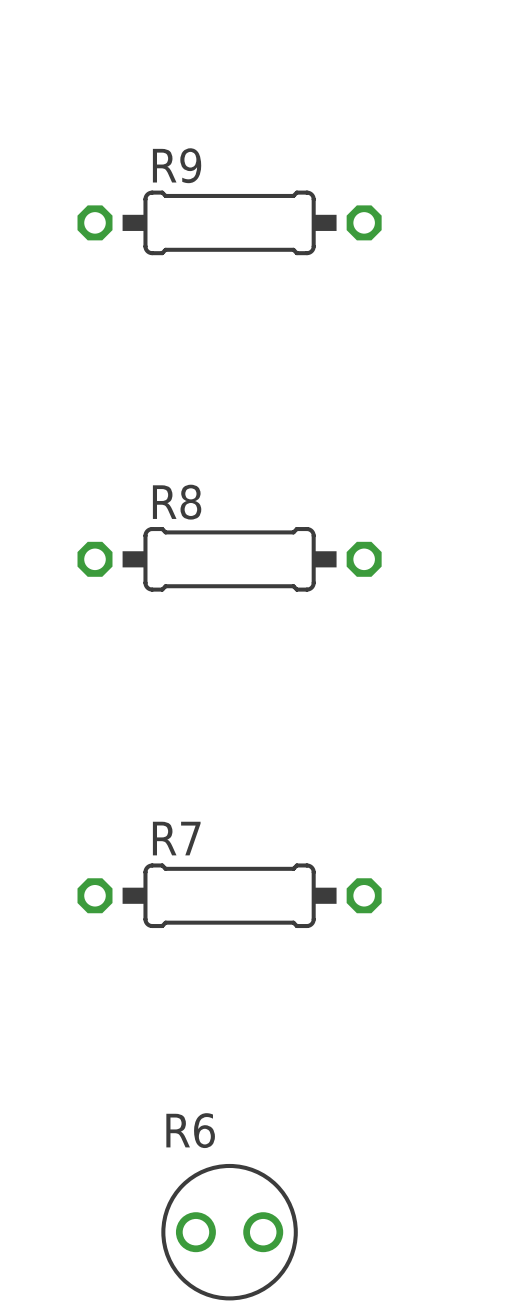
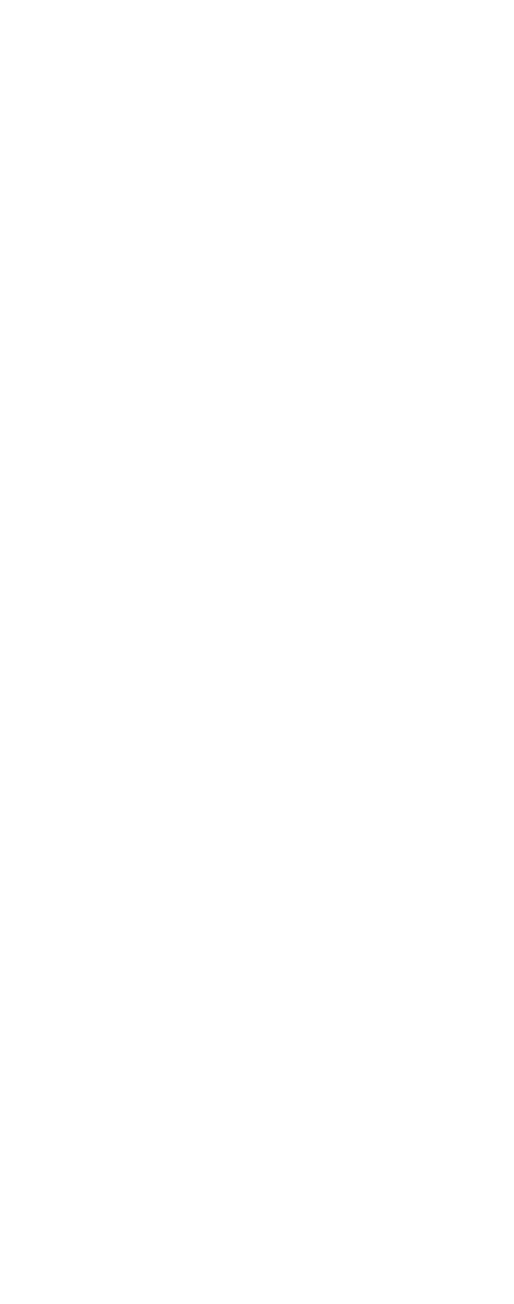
R9: (229, 222) -> none
R8: (229, 559) -> none
R7: (229, 895) -> none
R6: (229, 1232) -> none

